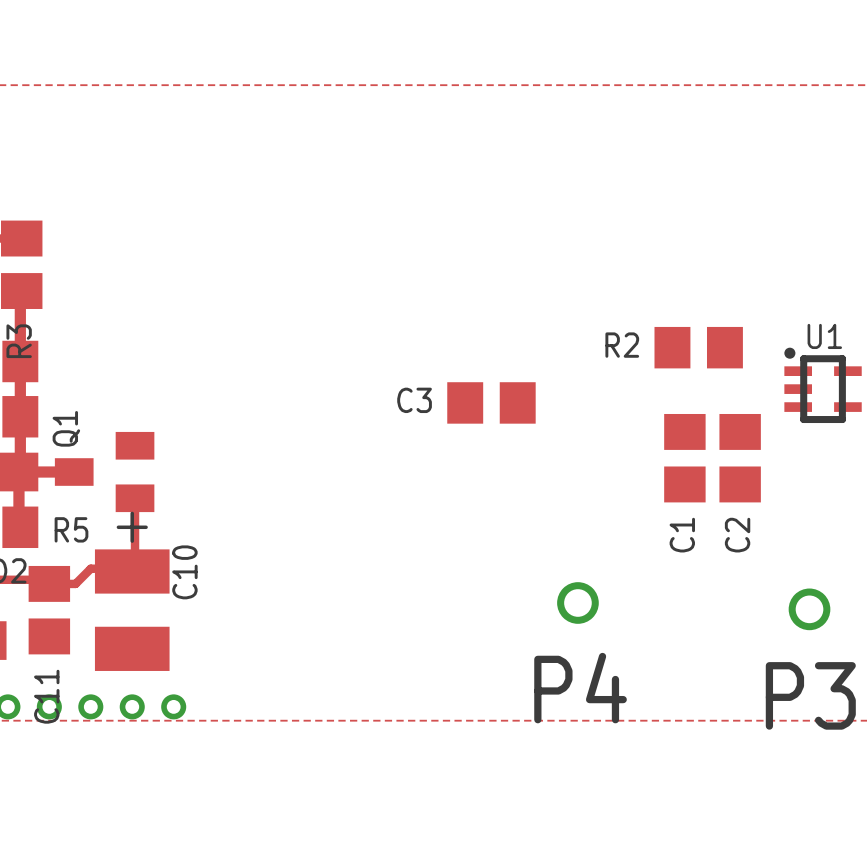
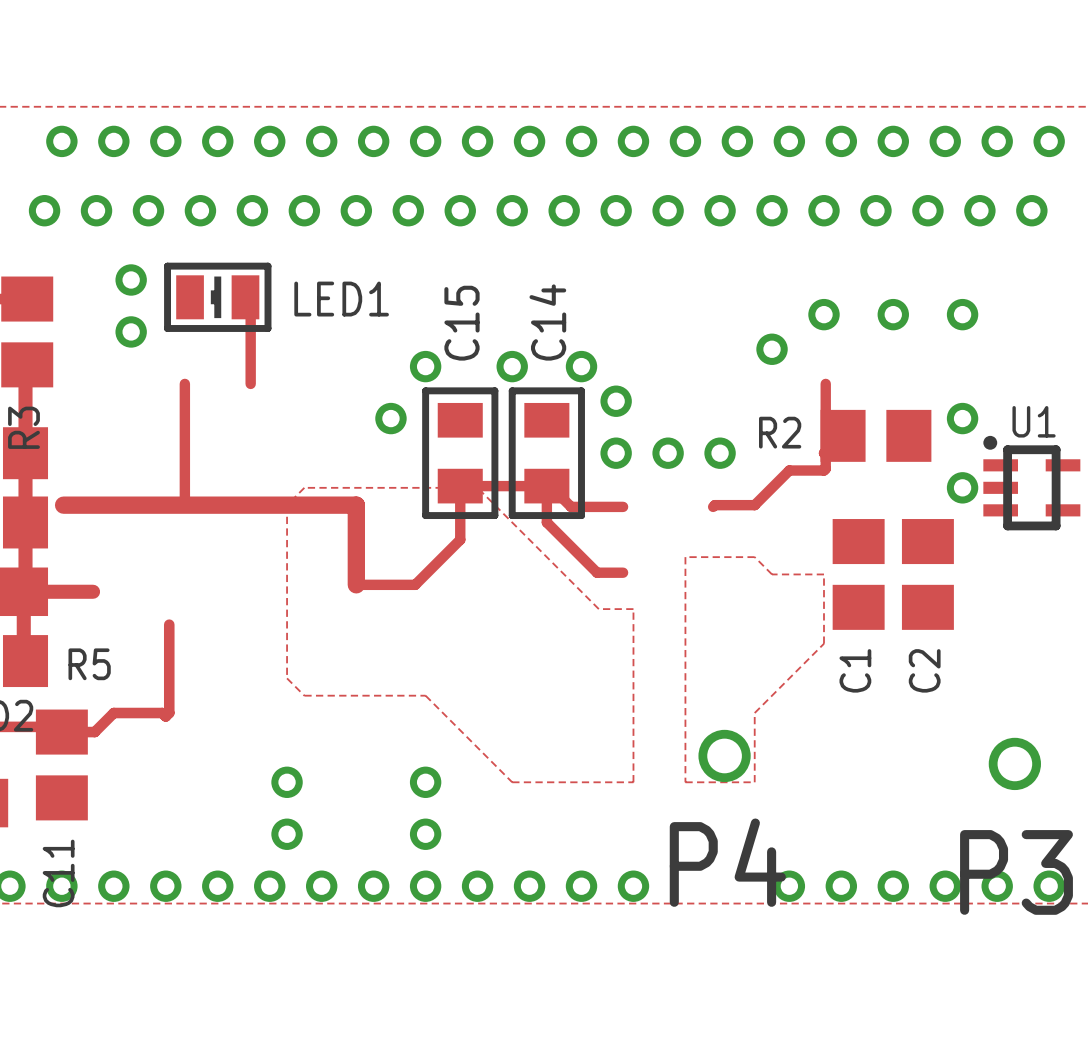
via: none -> (61, 141)
via: none -> (113, 141)
via: none -> (165, 141)
via: none -> (217, 141)
via: none -> (269, 141)
via: none -> (321, 141)
via: none -> (373, 141)
via: none -> (425, 141)
via: none -> (477, 141)
via: none -> (529, 141)
via: none -> (581, 141)
via: none -> (633, 141)
via: none -> (685, 141)
via: none -> (737, 141)
via: none -> (789, 141)
via: none -> (841, 141)
via: none -> (893, 141)
via: none -> (945, 141)
via: none -> (997, 141)
via: none -> (1049, 141)
via: none -> (44, 210)
via: none -> (96, 210)
via: none -> (148, 210)
via: none -> (200, 210)
via: none -> (252, 210)
via: none -> (304, 210)
via: none -> (356, 210)
via: none -> (408, 210)
via: none -> (460, 210)
via: none -> (512, 210)
via: none -> (564, 210)
via: none -> (616, 210)
via: none -> (668, 210)
via: none -> (720, 210)
via: none -> (772, 210)
via: none -> (824, 210)
via: none -> (875, 210)
via: none -> (927, 210)
via: none -> (979, 210)
via: none -> (1031, 210)
via: none -> (131, 279)
LED1: none -> (217, 297)
track: none -> (245, 297) (250, 302) (250, 383)
via: none -> (824, 314)
via: none -> (893, 314)
via: none -> (962, 314)
via: none -> (131, 331)
via: none -> (772, 349)
via: none -> (425, 366)
via: none -> (512, 366)
via: none -> (581, 366)
track: none -> (184, 383) (184, 503) (183, 505)
track: none -> (825, 383) (825, 451) (824, 453) (825, 453) (825, 468) (824, 470) (789, 470) (754, 505) (714, 505) (713, 506)
via: none -> (616, 401)
via: none -> (390, 418)
via: none -> (962, 418)
C15: none -> (460, 453)
C14: none -> (546, 453)
via: none -> (616, 453)
via: none -> (668, 453)
via: none -> (720, 453)
track: none -> (546, 486) (546, 522) (597, 572) (623, 572)
zone outline: none -> (304, 487) (287, 505) (287, 678) (304, 695) (425, 695) (512, 782) (633, 782) (633, 609) (598, 609) (477, 487) (304, 487)
via: none -> (962, 487)
track: none -> (63, 505) (356, 505) (356, 584) (415, 584) (460, 539) (460, 486) (550, 486) (571, 506) (623, 506)
C3: (491, 402) -> none
zone outline: none -> (685, 557) (685, 782) (754, 782) (754, 713) (824, 643) (824, 574) (772, 574) (754, 557) (685, 557)
Q1: (104, 472) -> none
C10: (132, 591) -> none
via: none -> (287, 782)
via: none -> (425, 782)
via: none -> (287, 834)
via: none -> (425, 834)
via: none -> (269, 886)
via: none -> (321, 886)
via: none -> (373, 886)
via: none -> (425, 886)
via: none -> (477, 886)
via: none -> (529, 886)
via: none -> (581, 886)
via: none -> (633, 886)
via: none -> (789, 886)
via: none -> (841, 886)
via: none -> (893, 886)
via: none -> (945, 886)
via: none -> (997, 886)
via: none -> (1049, 886)

